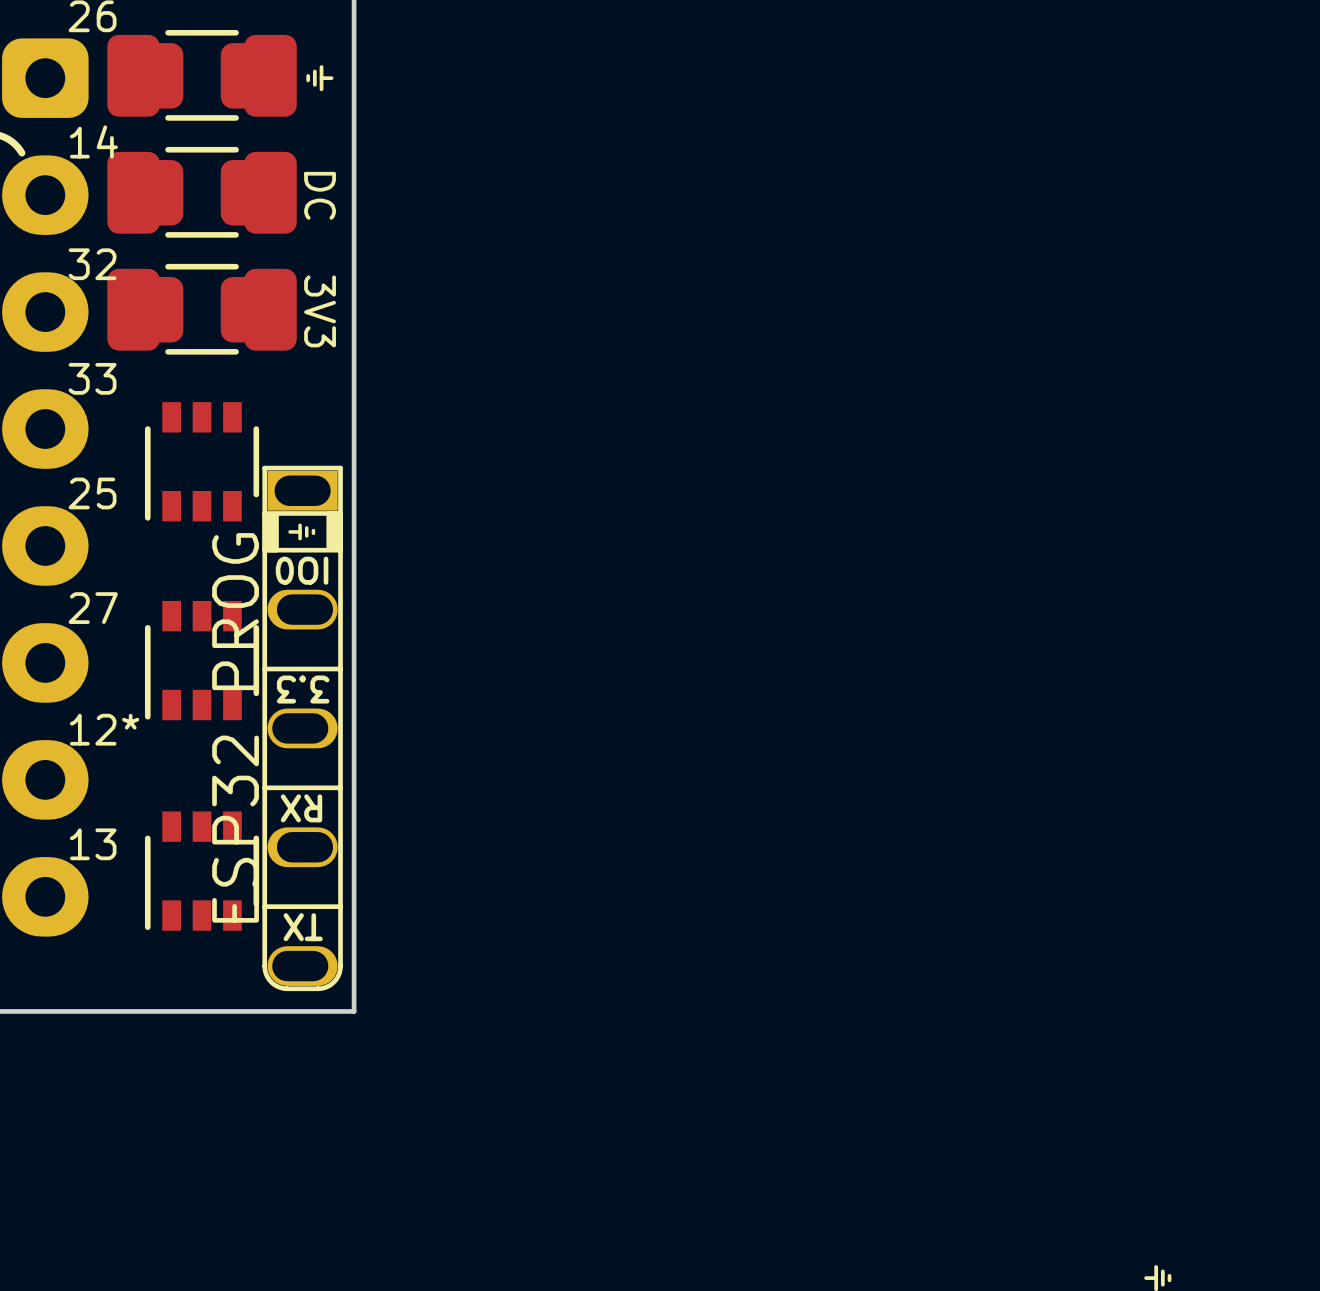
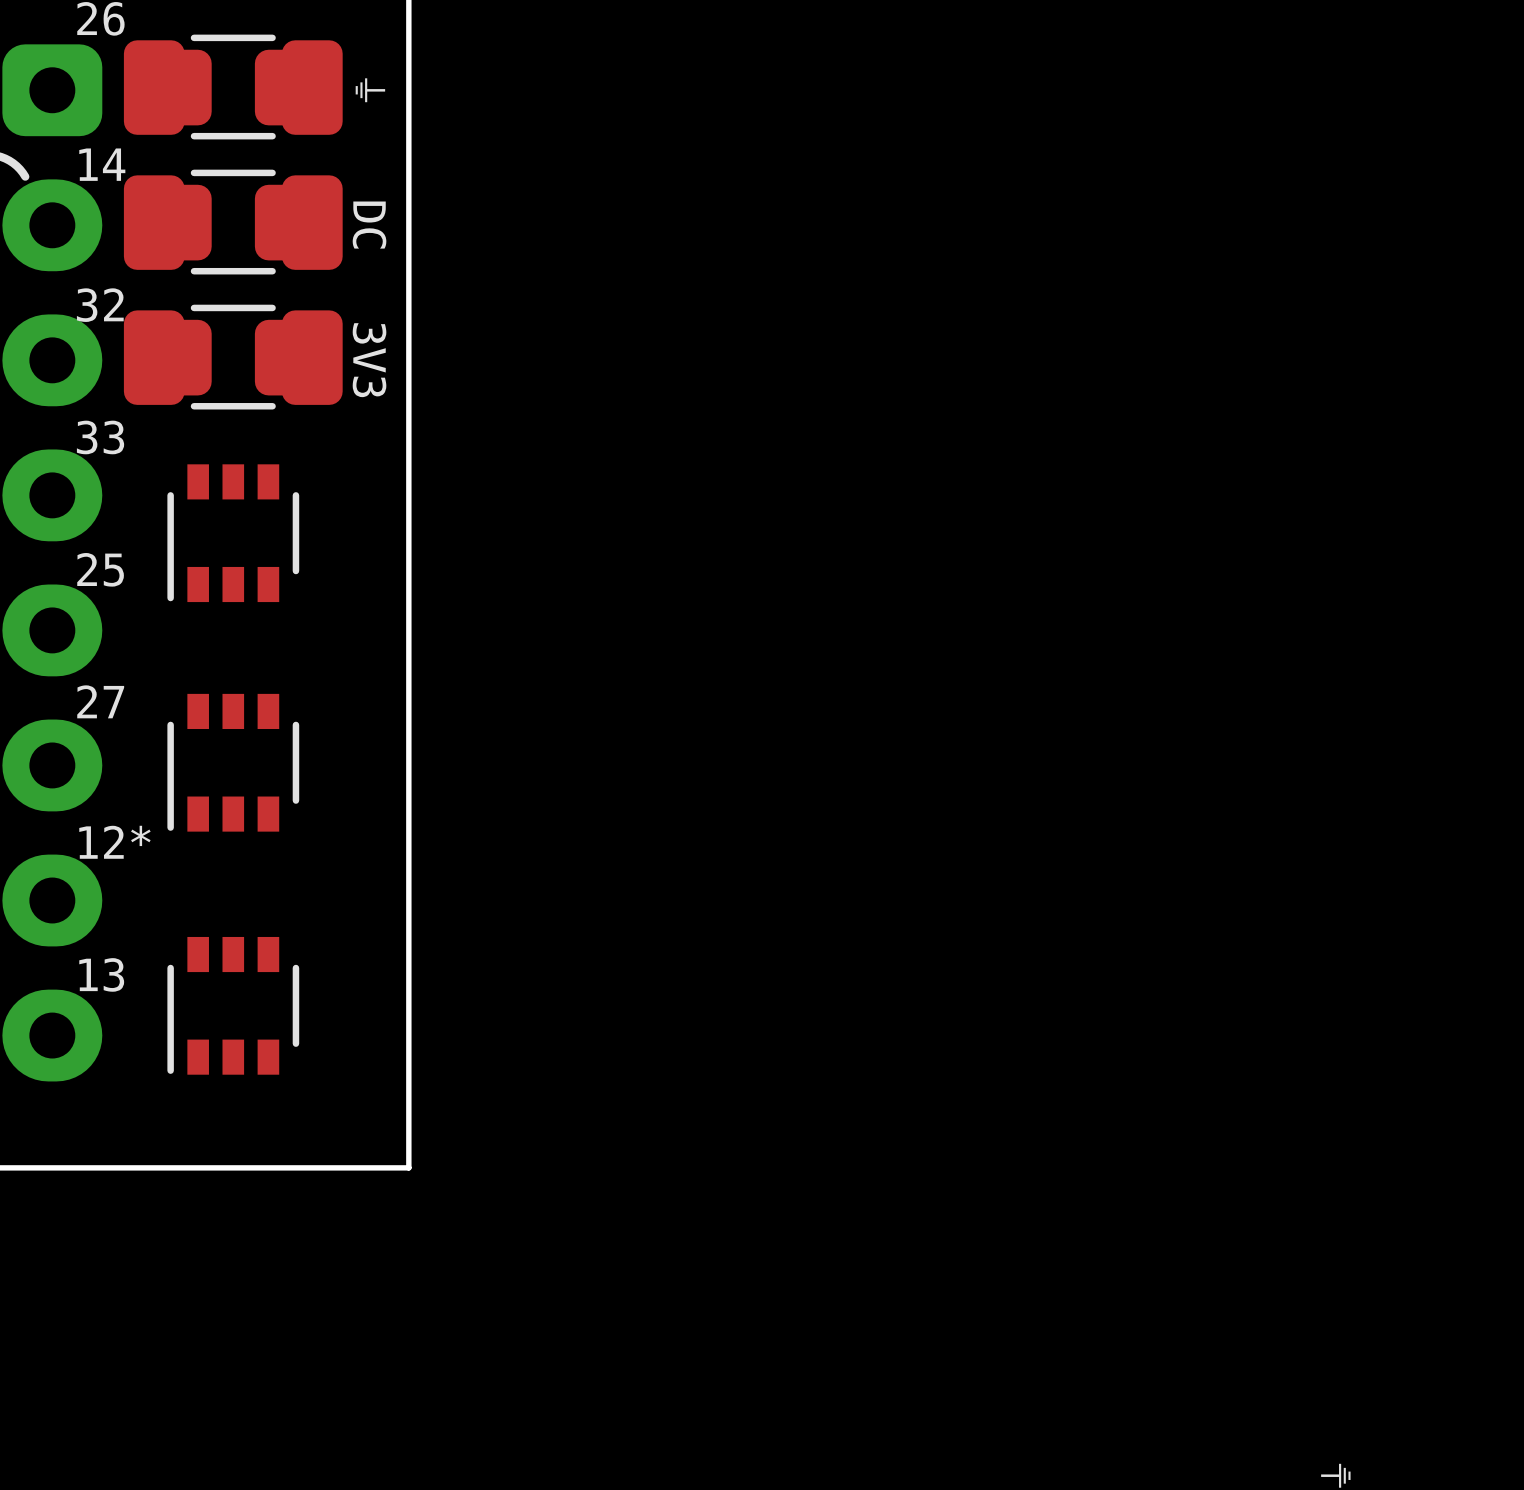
part: (302, 728) -> none

